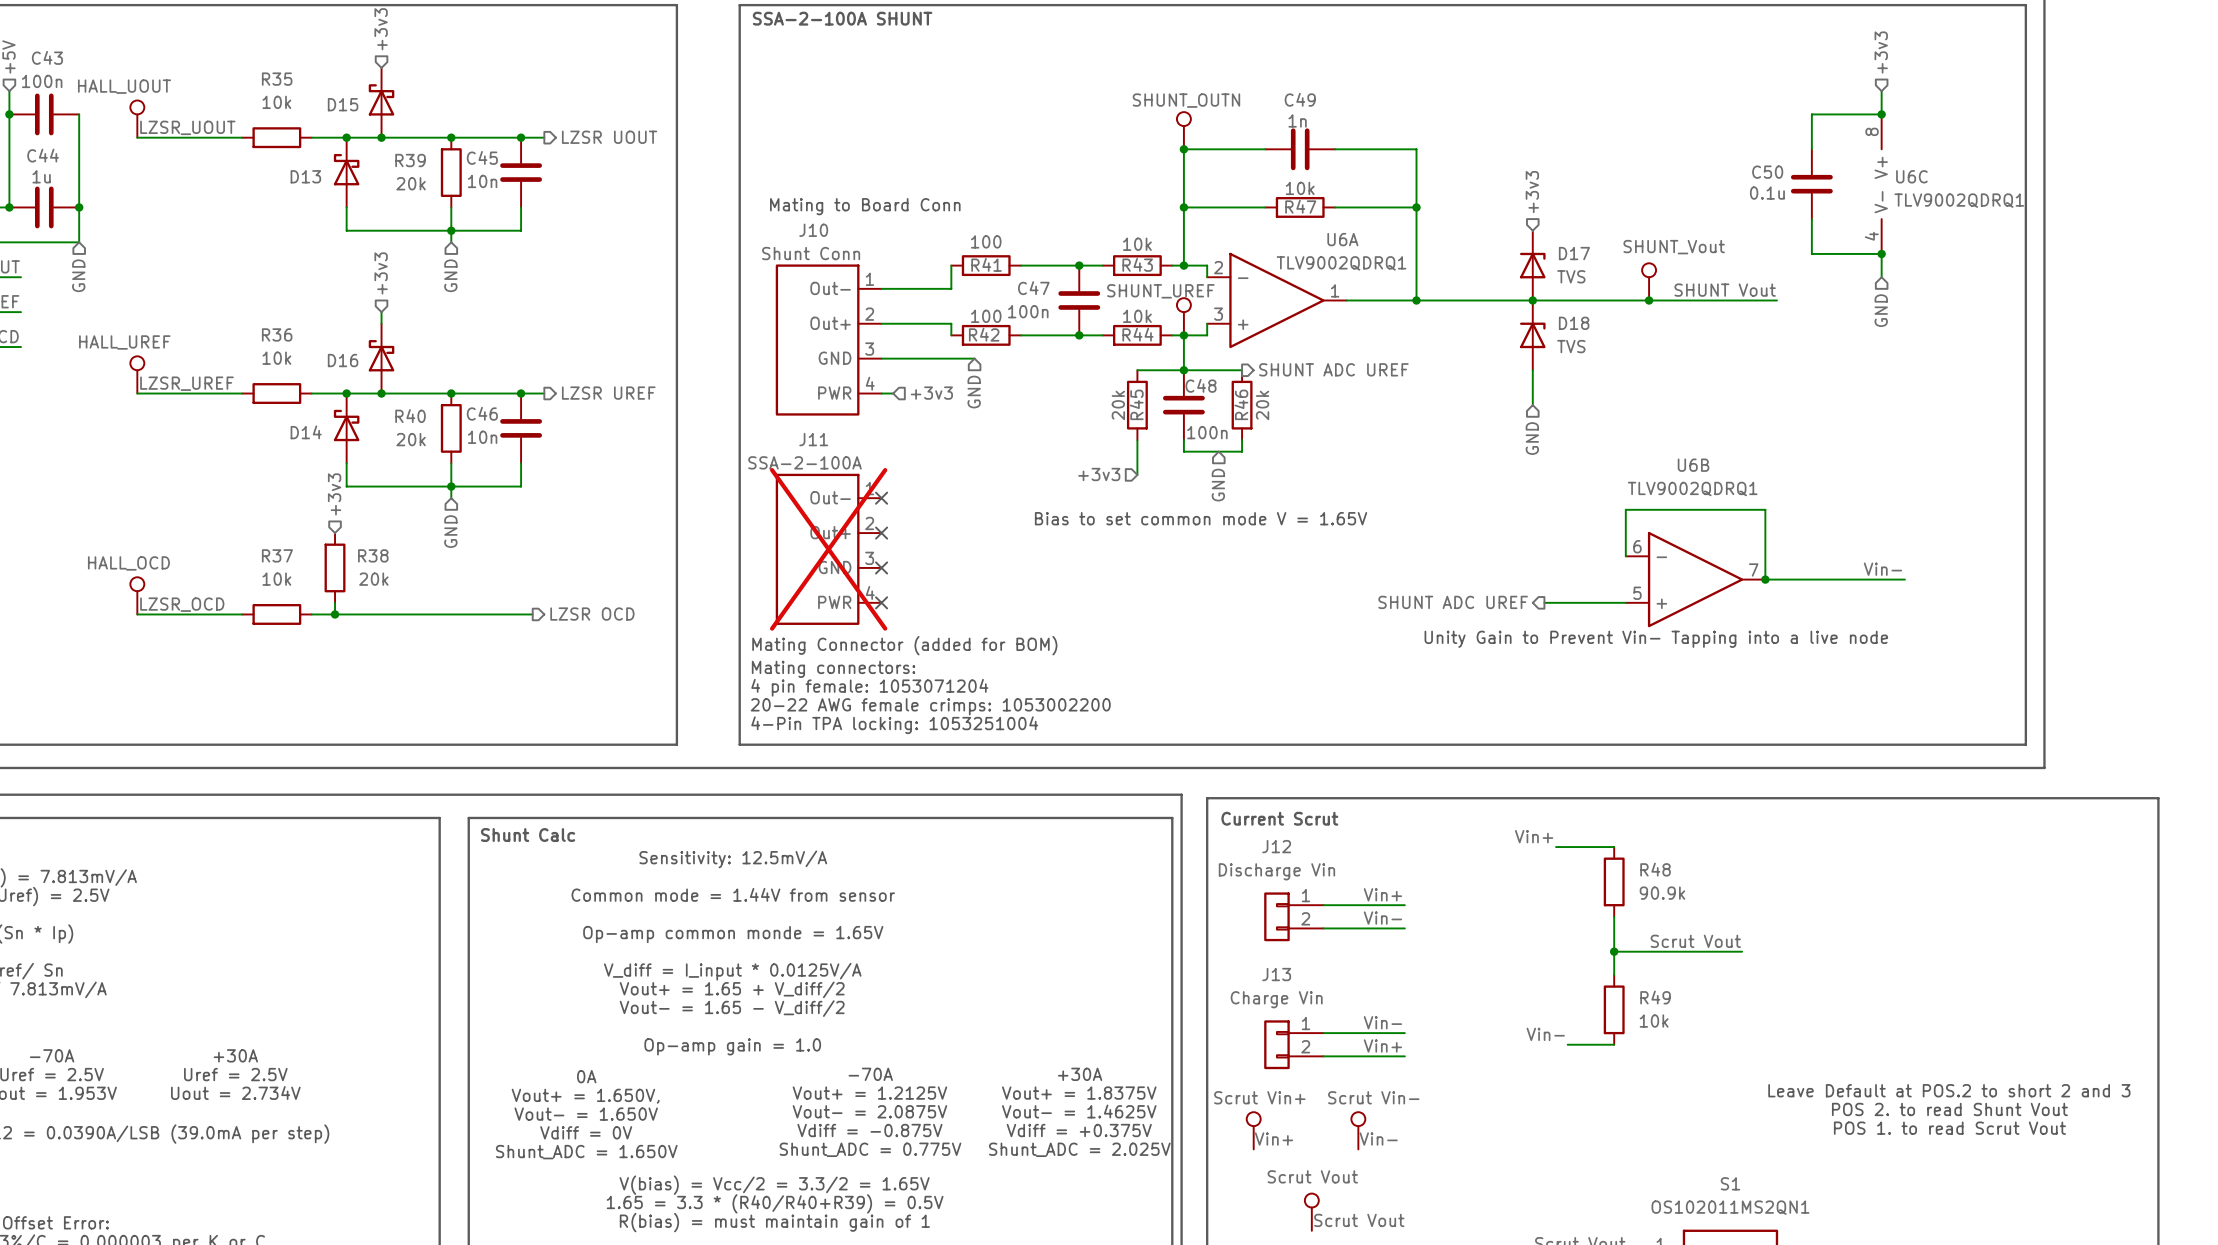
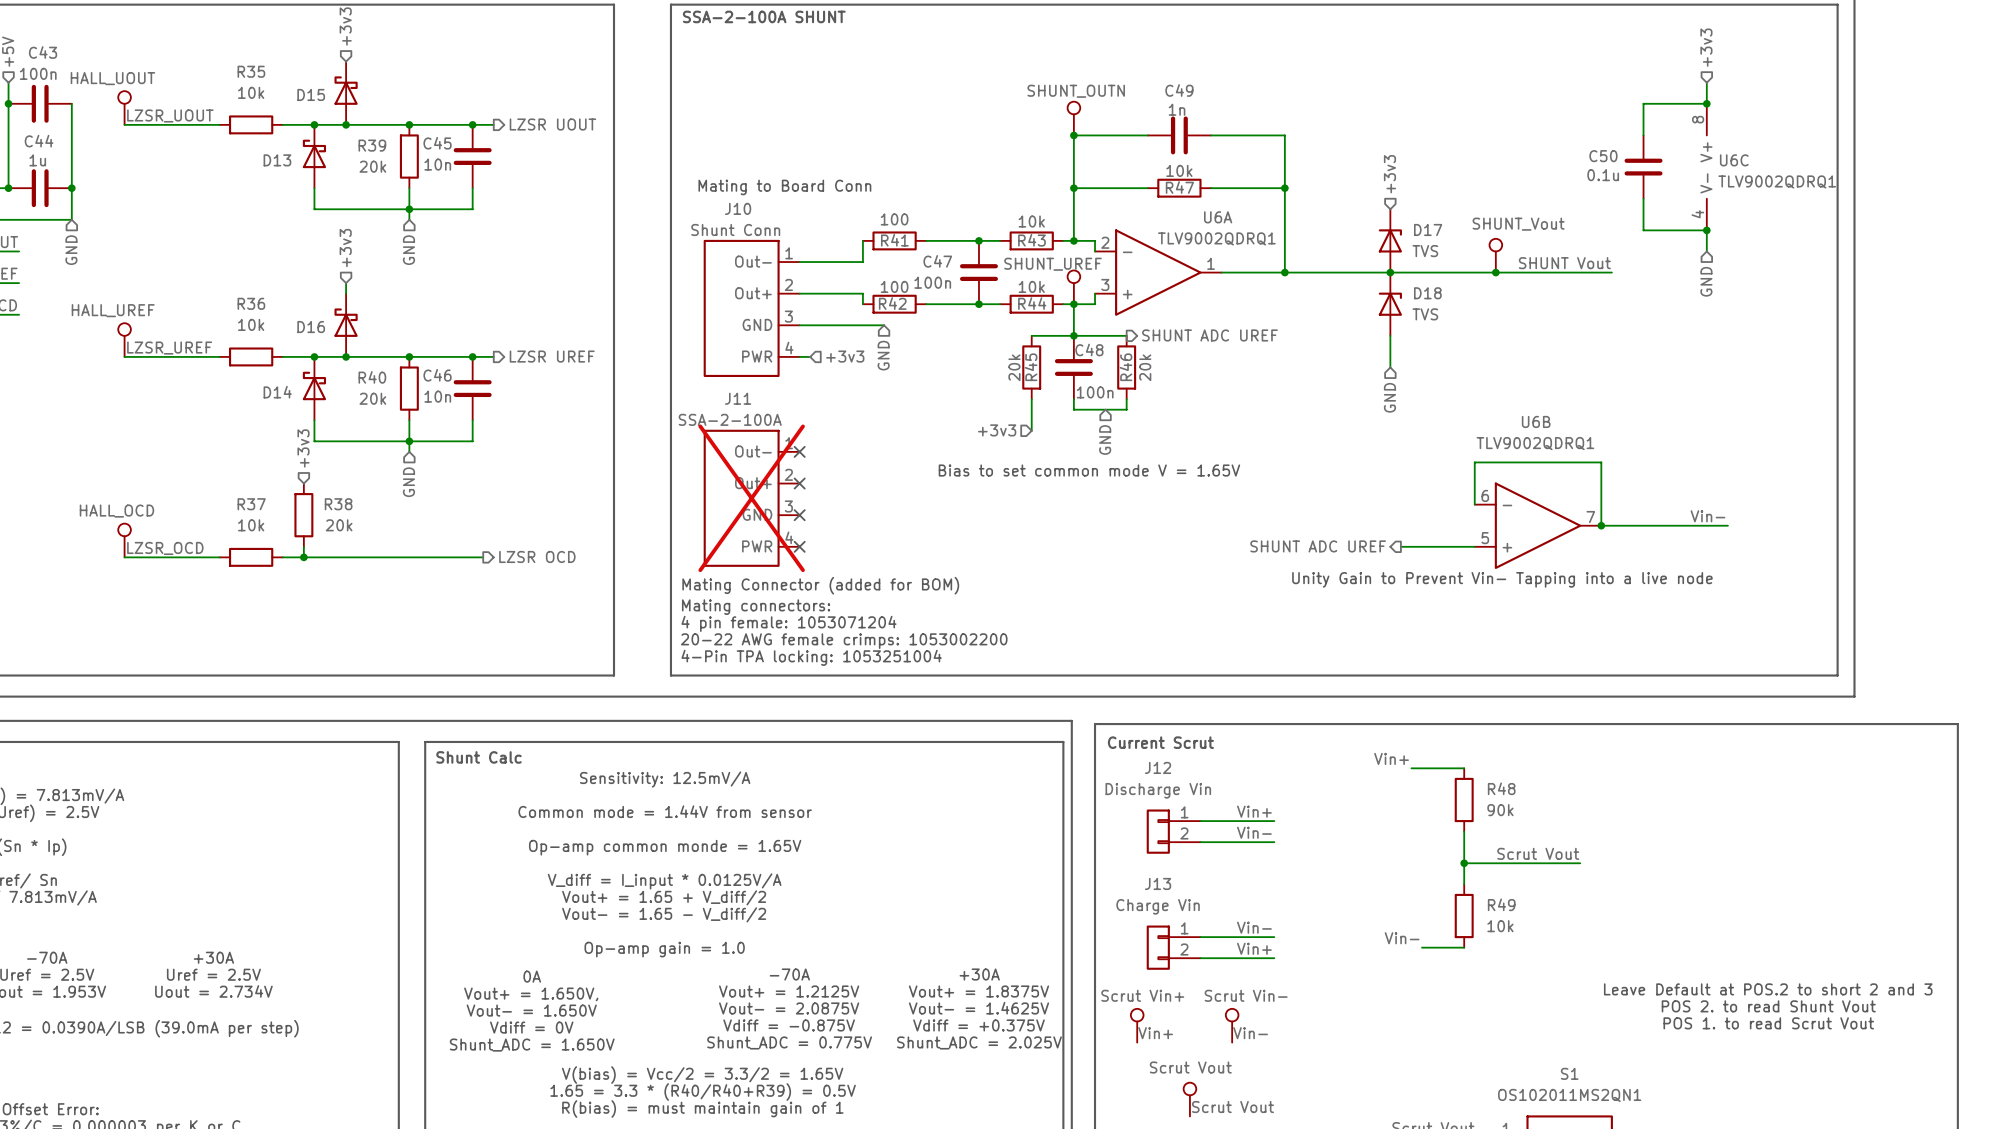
R48 value: 90.9k (1662, 893) -> 90k (1500, 810)

